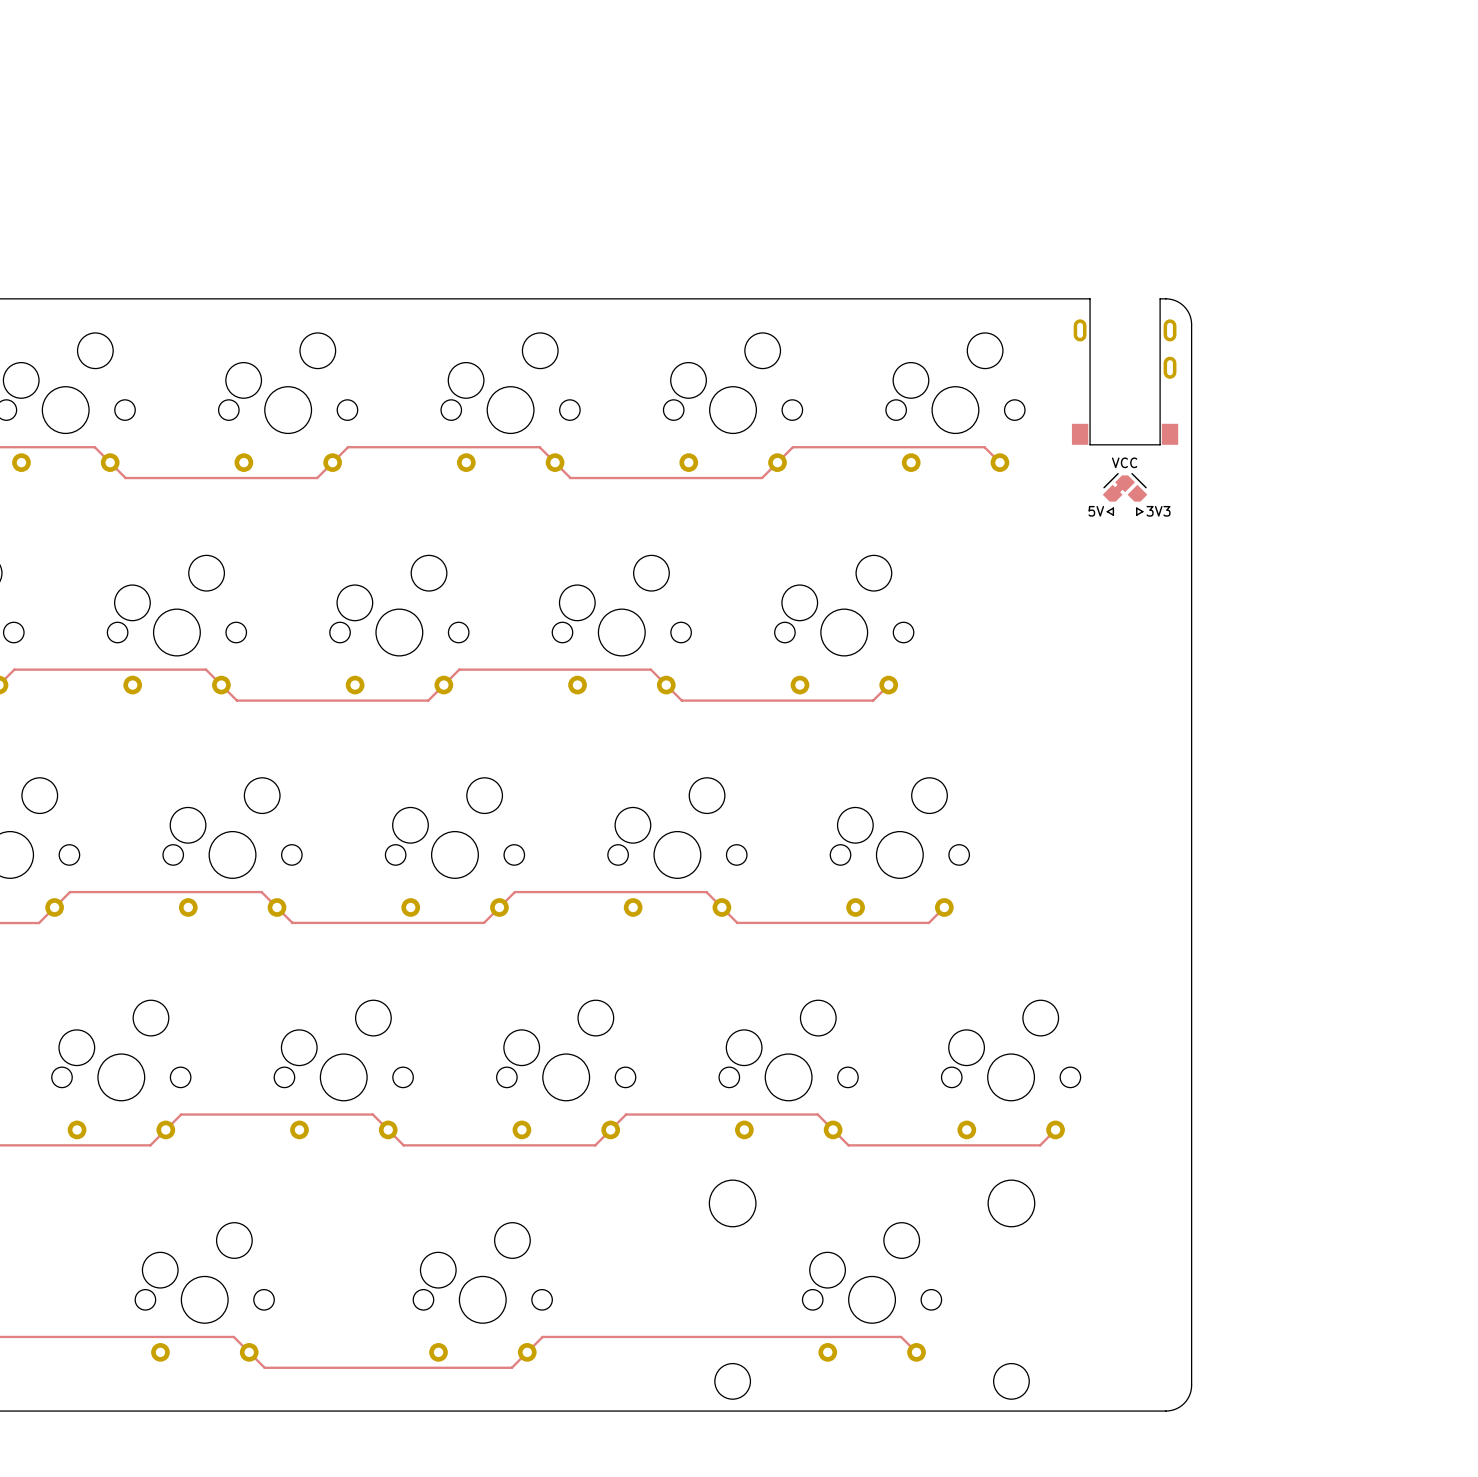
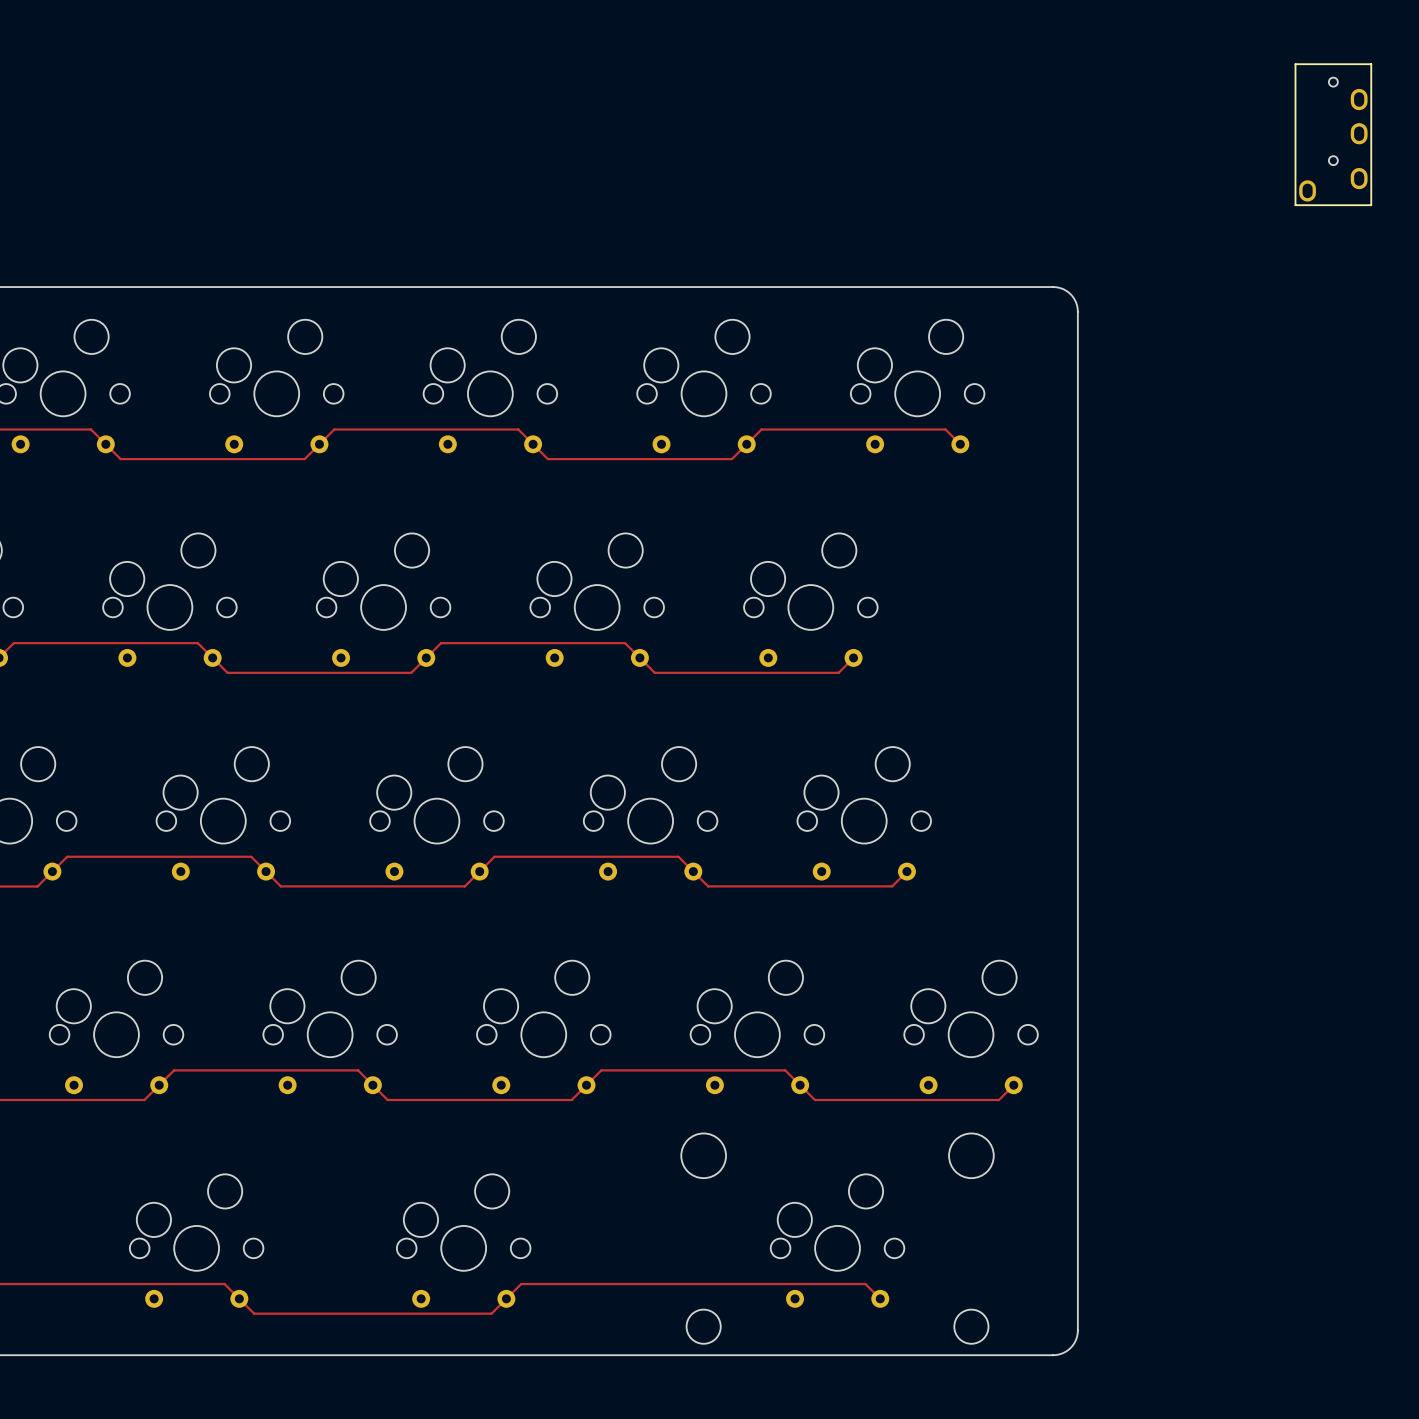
part: none -> (1333, 134)
board edge: (1160, 298) (1171, 299) (1181, 304) (1189, 313) (1191, 324) (1191, 1388) (1186, 1401) (1171, 1410) (1096, 1411) -> (1046, 287) (1058, 287) (1068, 292) (1075, 300) (1077, 311) (1077, 1330) (1075, 1341) (1070, 1347) (1063, 1352) (1053, 1355)
part: (1125, 371) -> none
part: (1125, 494) -> none

